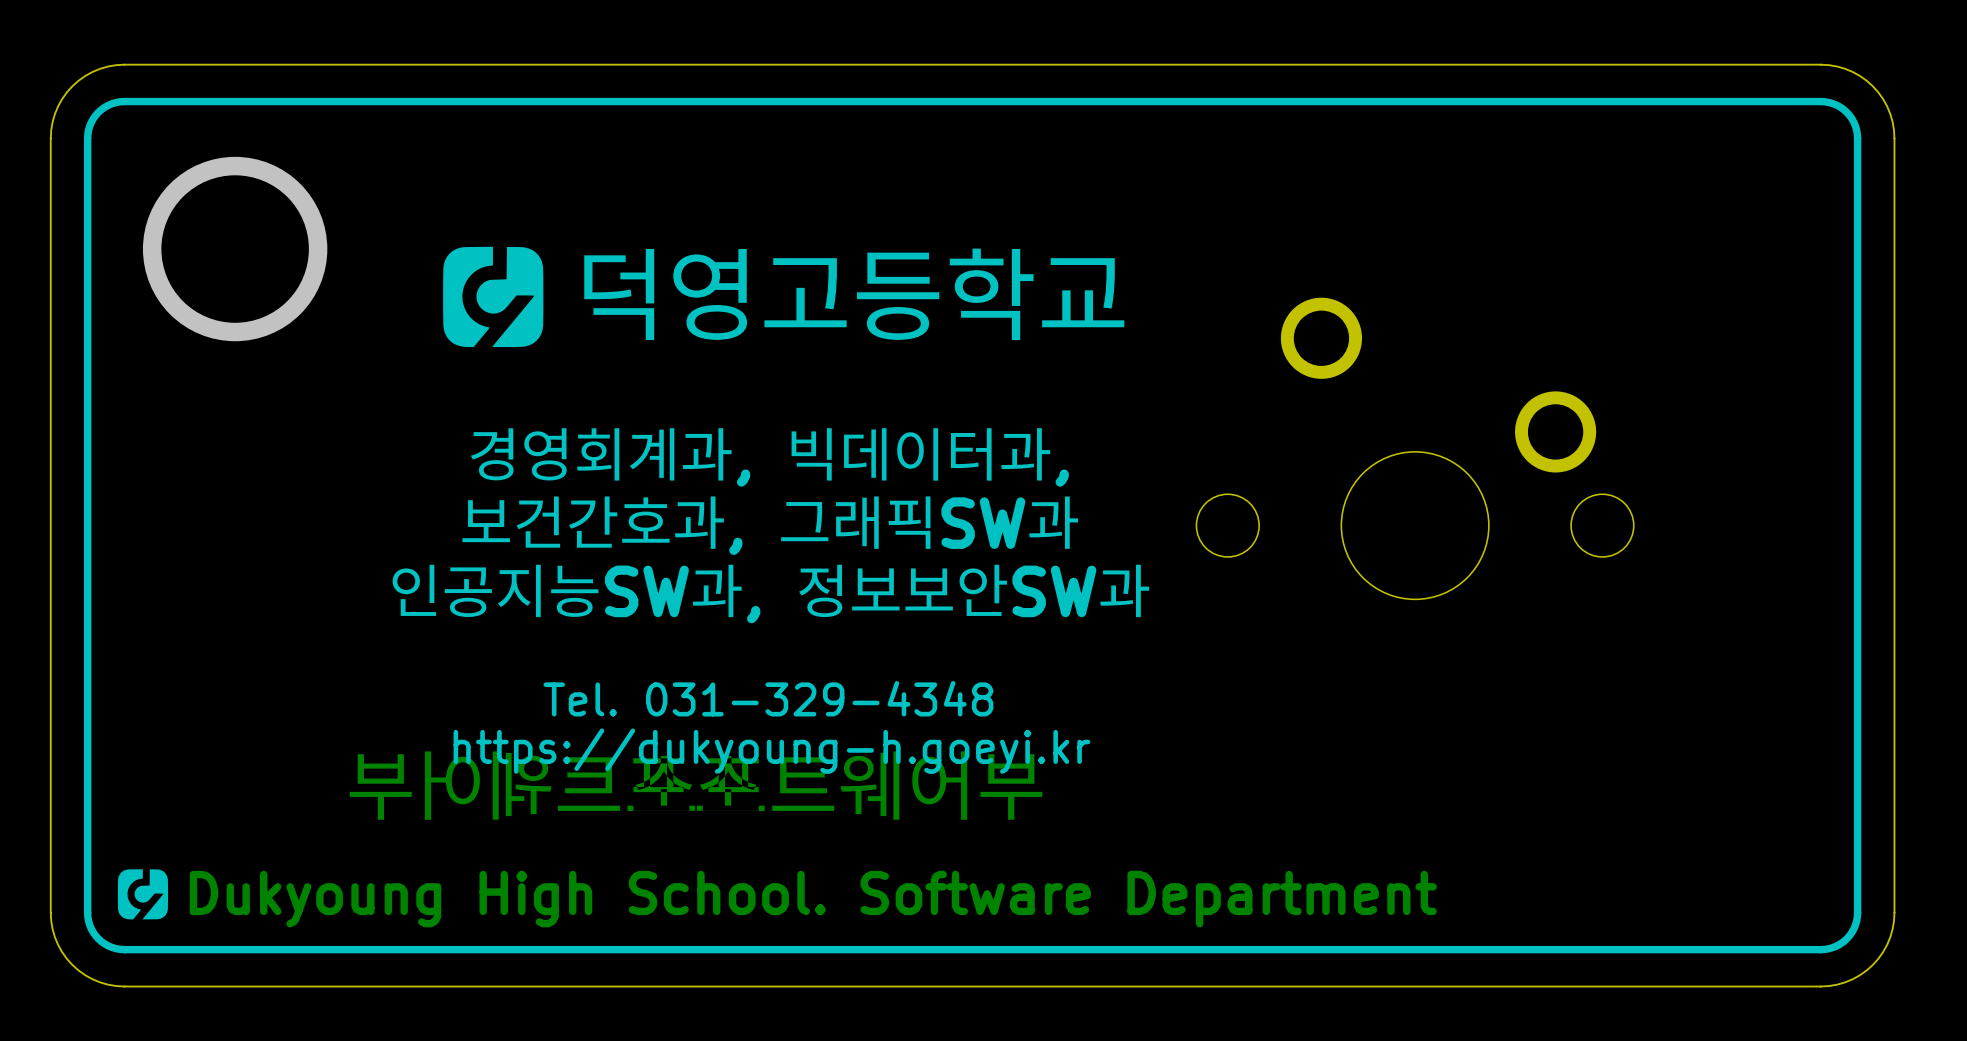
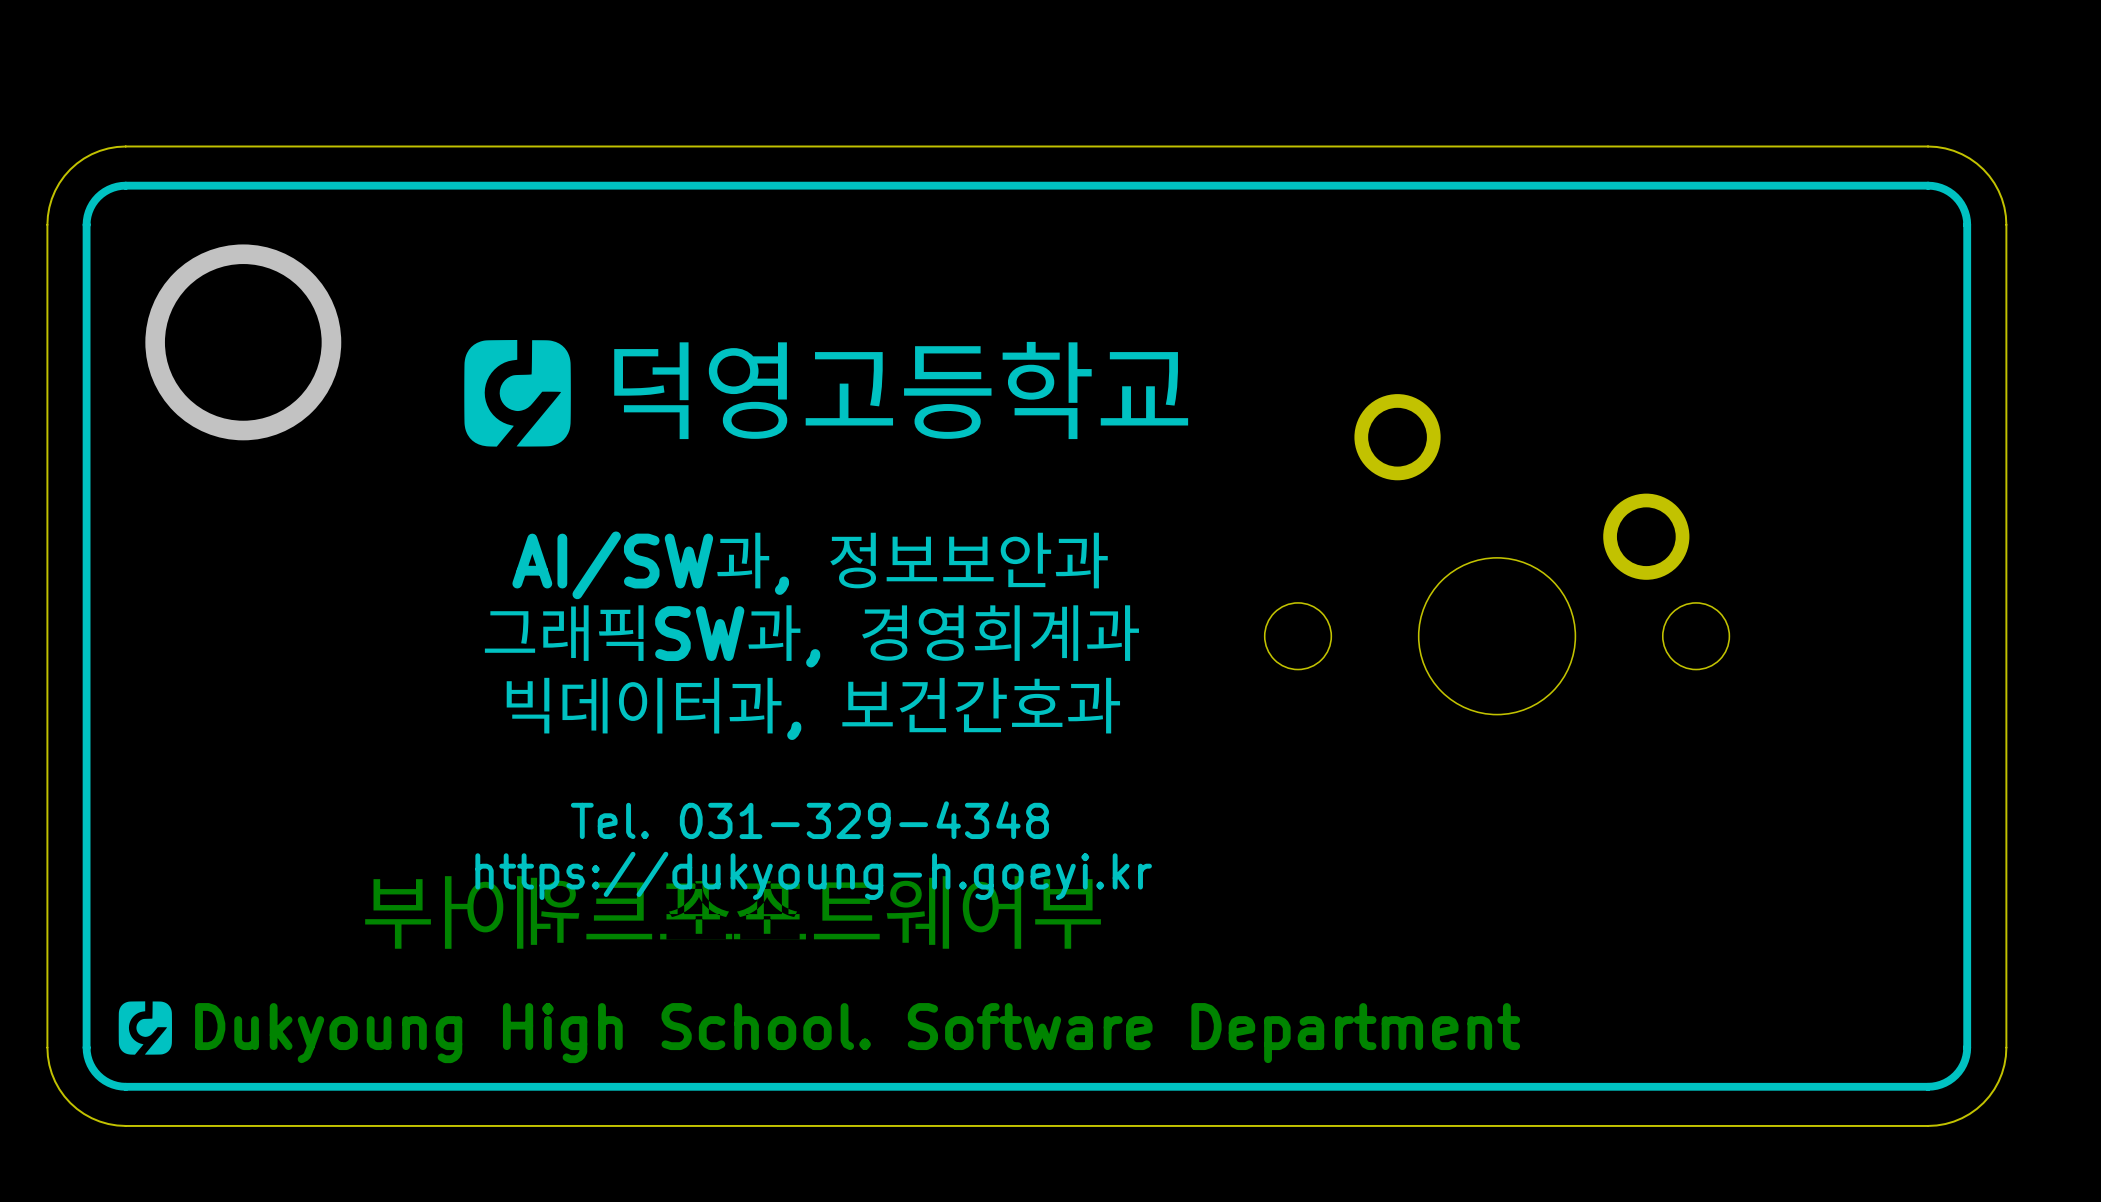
text: 경영회계과, 빅데이터과, (767, 455) -> AI/SW과, 정보보안과 (812, 563)
text: 보건간호과, 그래픽SW과 (770, 523) -> 그래픽SW과, 경영회계과 (811, 633)
text: 인공지능SW과, 정보보안SW과 (770, 591) -> 빅데이터과, 보건간호과 (813, 706)

